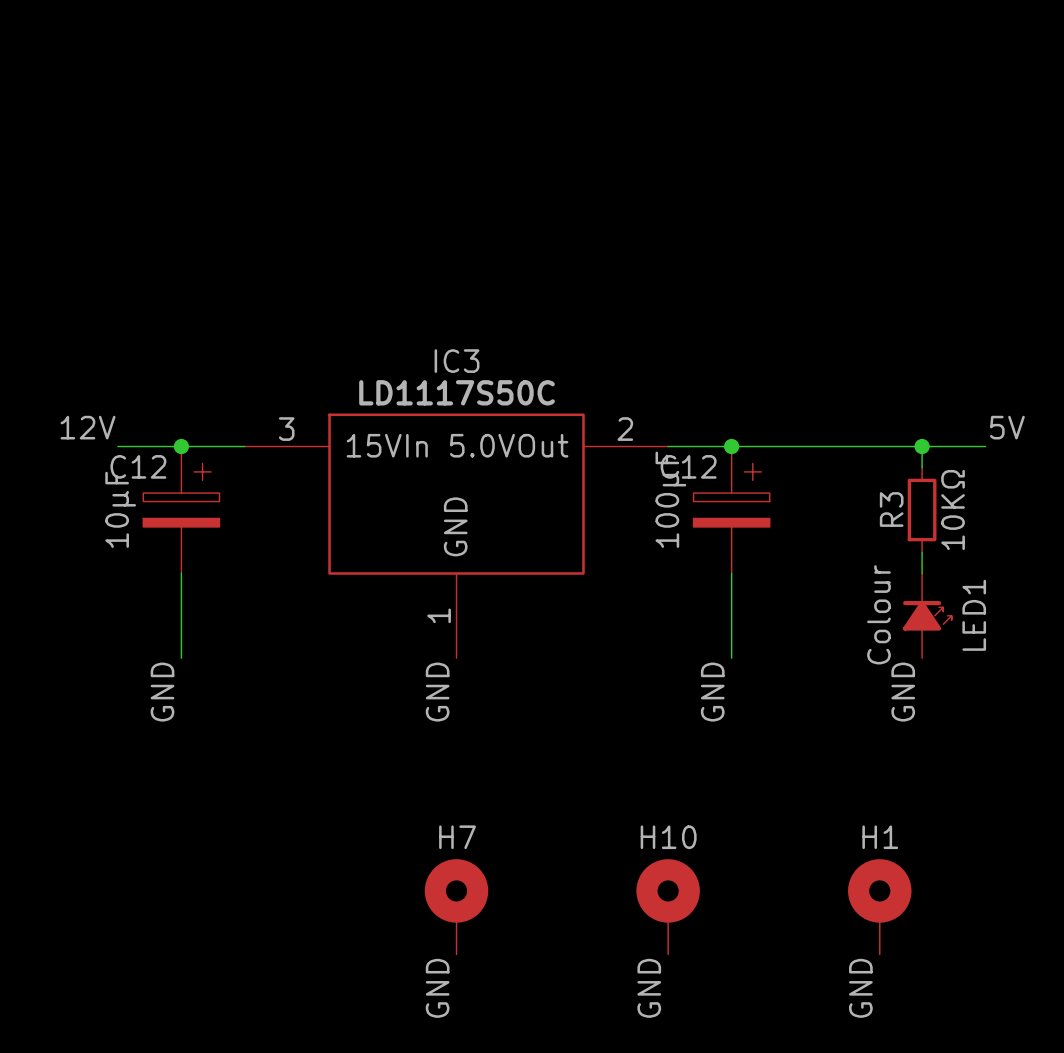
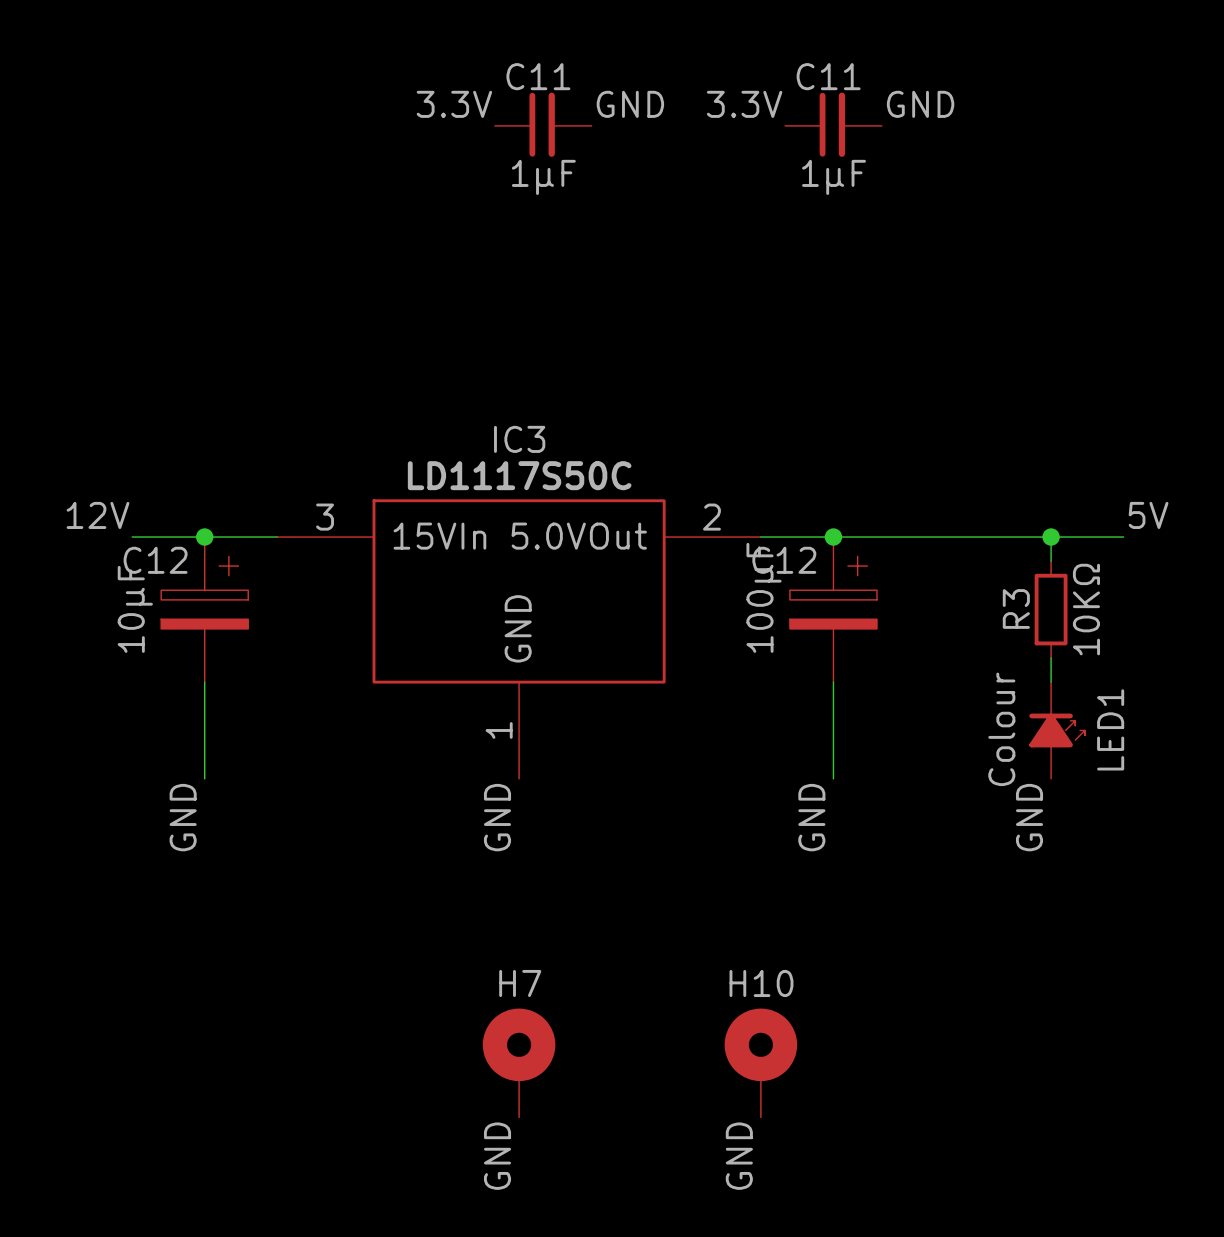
label: none -> 3.3V (454, 104)
label: none -> GND (630, 104)
label: none -> 3.3V (744, 104)
label: none -> GND (920, 104)
C11: none -> 1μF (543, 124)
C11: none -> 1μF (833, 124)
H1: (879, 906) -> none
label: GND (860, 988) -> none

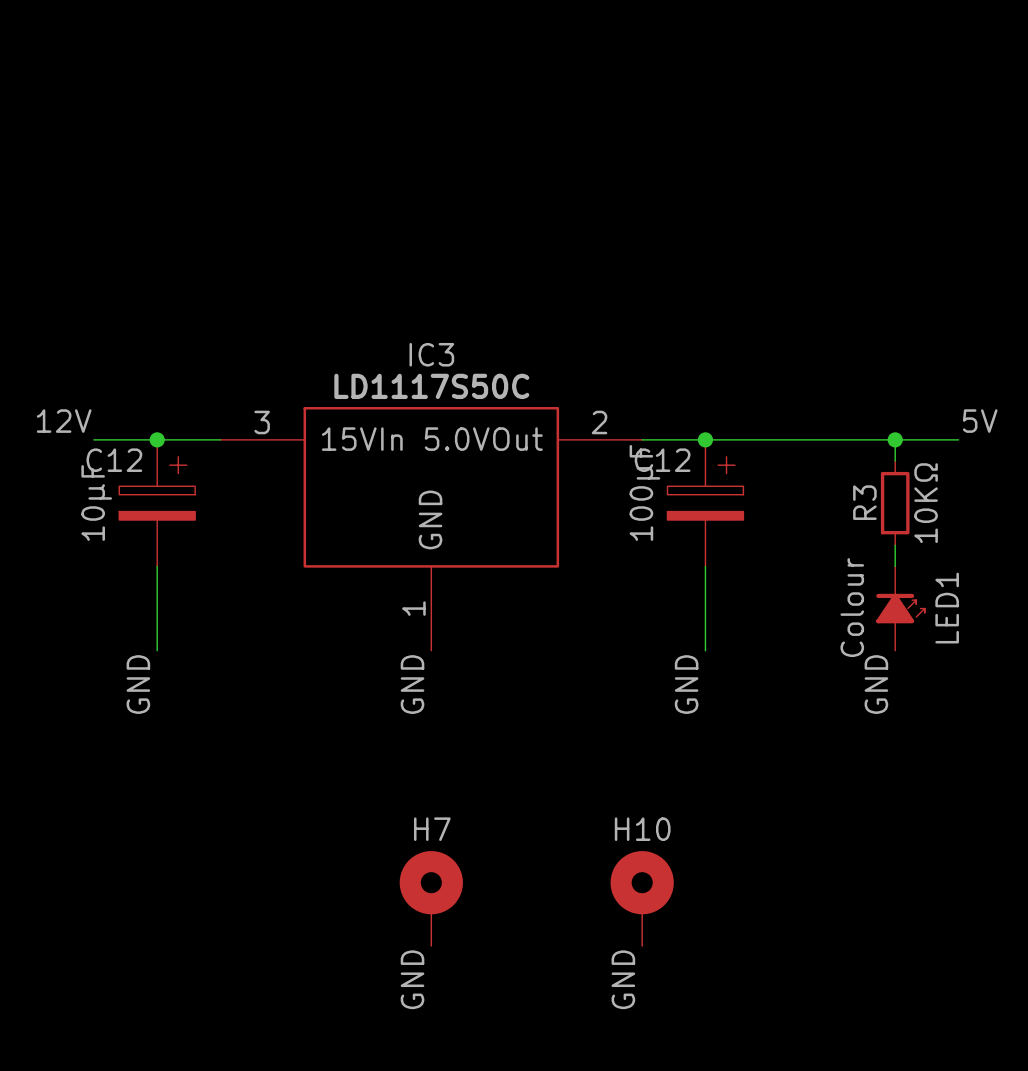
label: 3.3V (454, 104) -> none
label: GND (630, 104) -> none
label: 3.3V (744, 104) -> none
label: GND (920, 104) -> none
C11: 1μF (543, 124) -> none
C11: 1μF (833, 124) -> none

